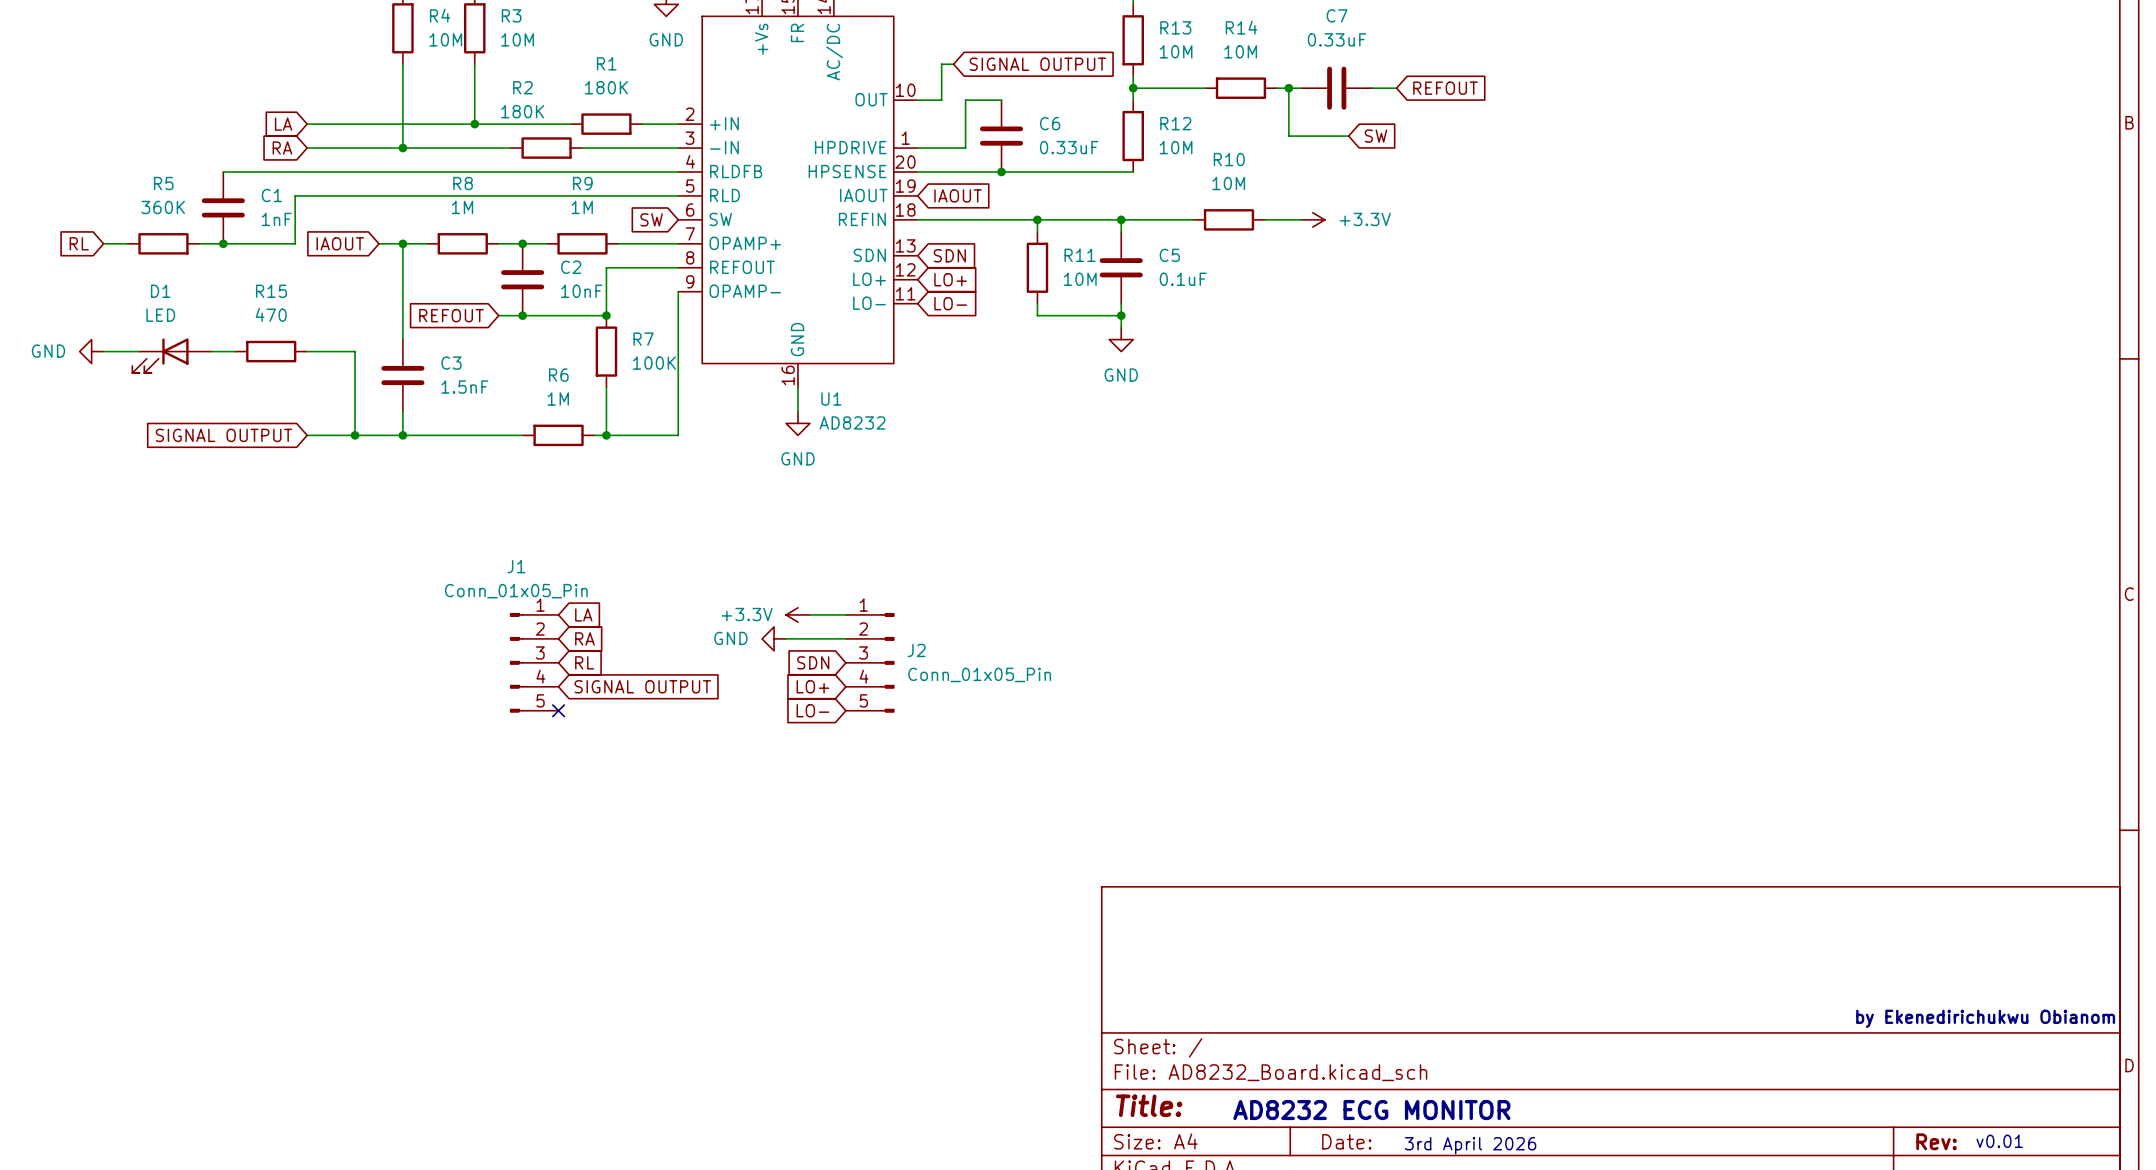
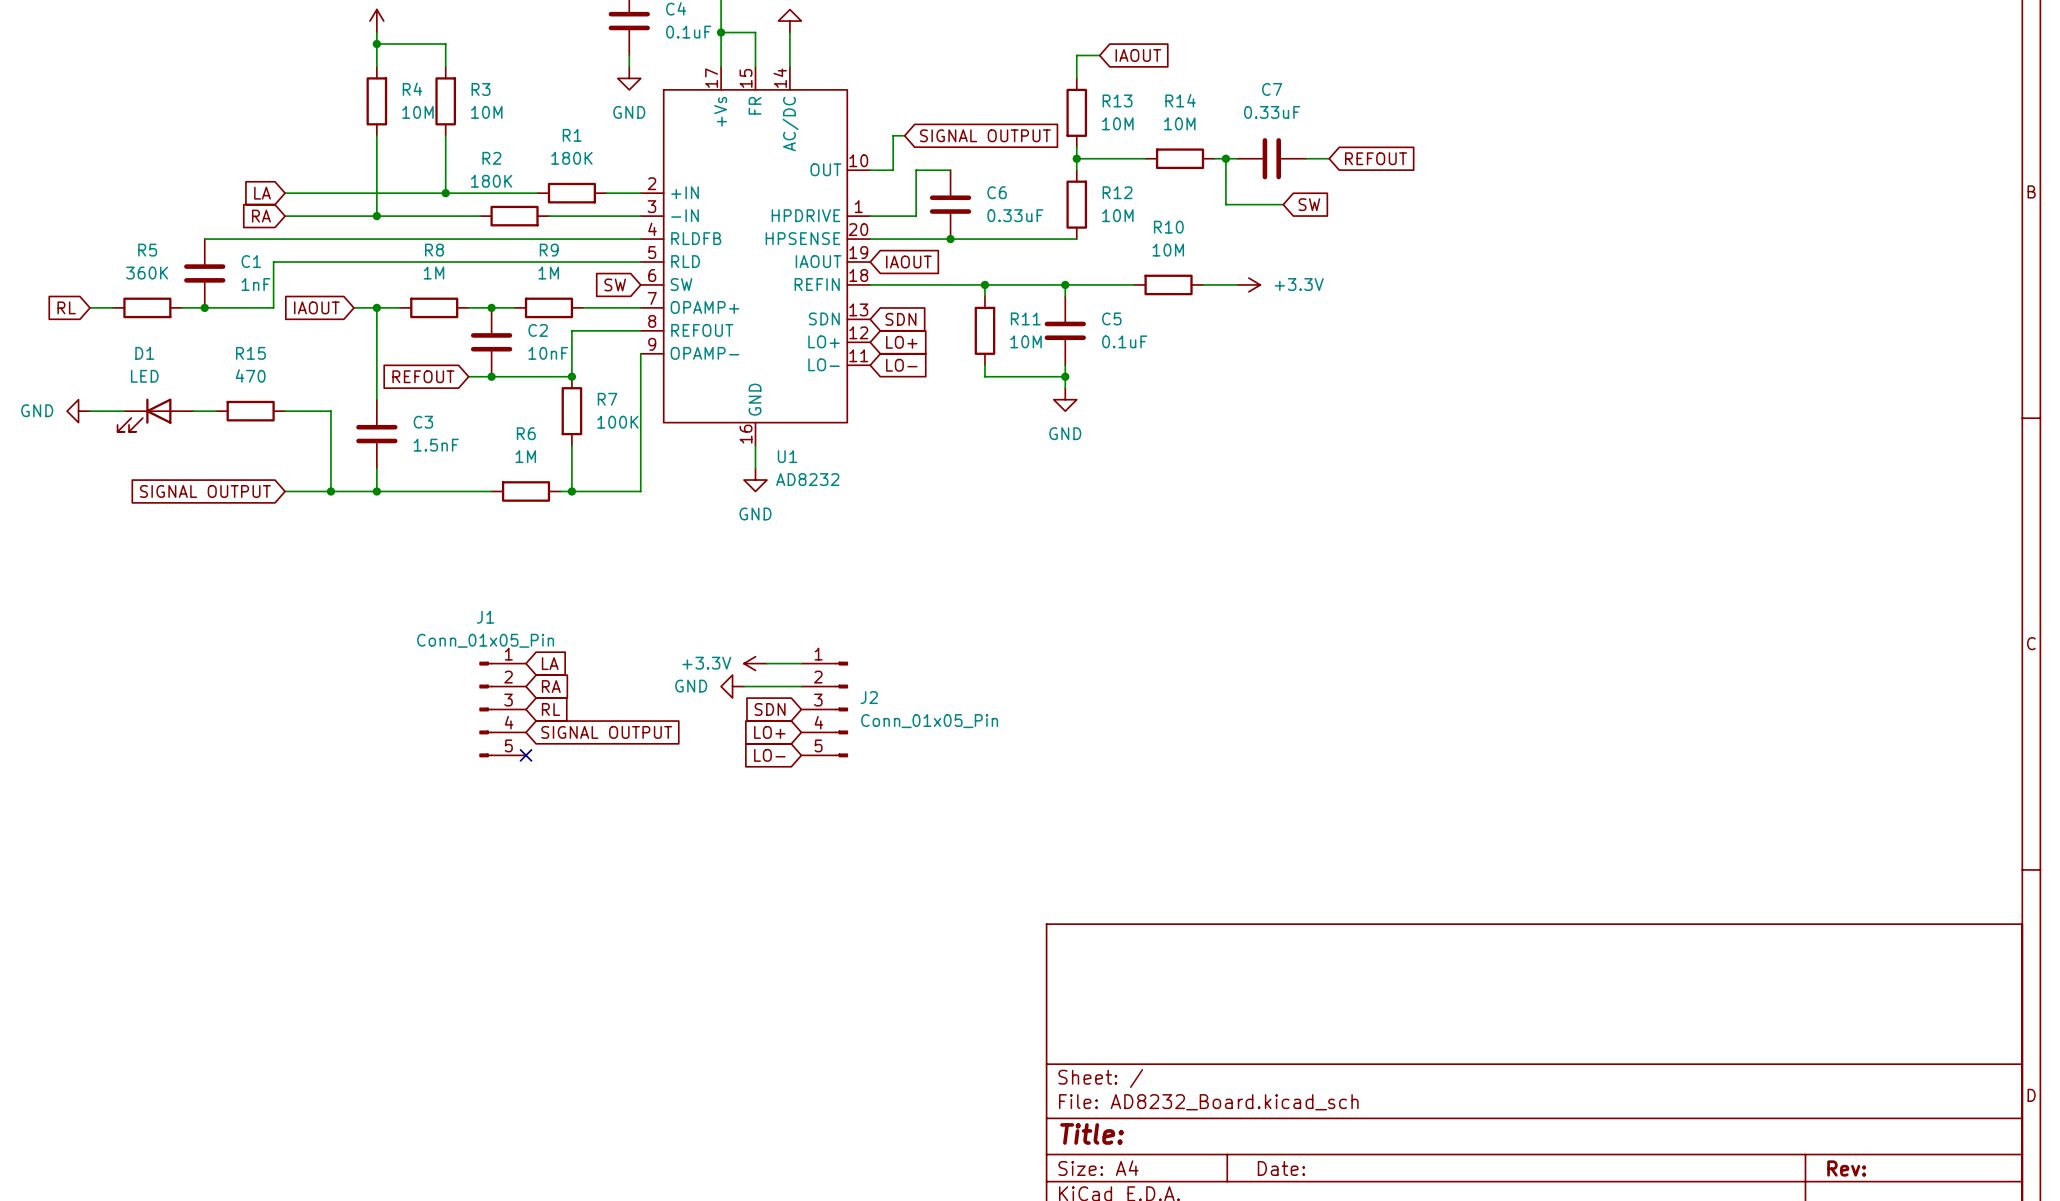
text: by Ekenedirichukwu Obianom (1985, 1018) -> none
text: AD8232 ECG MONITOR (1371, 1110) -> none
text: v0.01 (1999, 1141) -> none
text: 3rd April 2026 (1470, 1145) -> none

